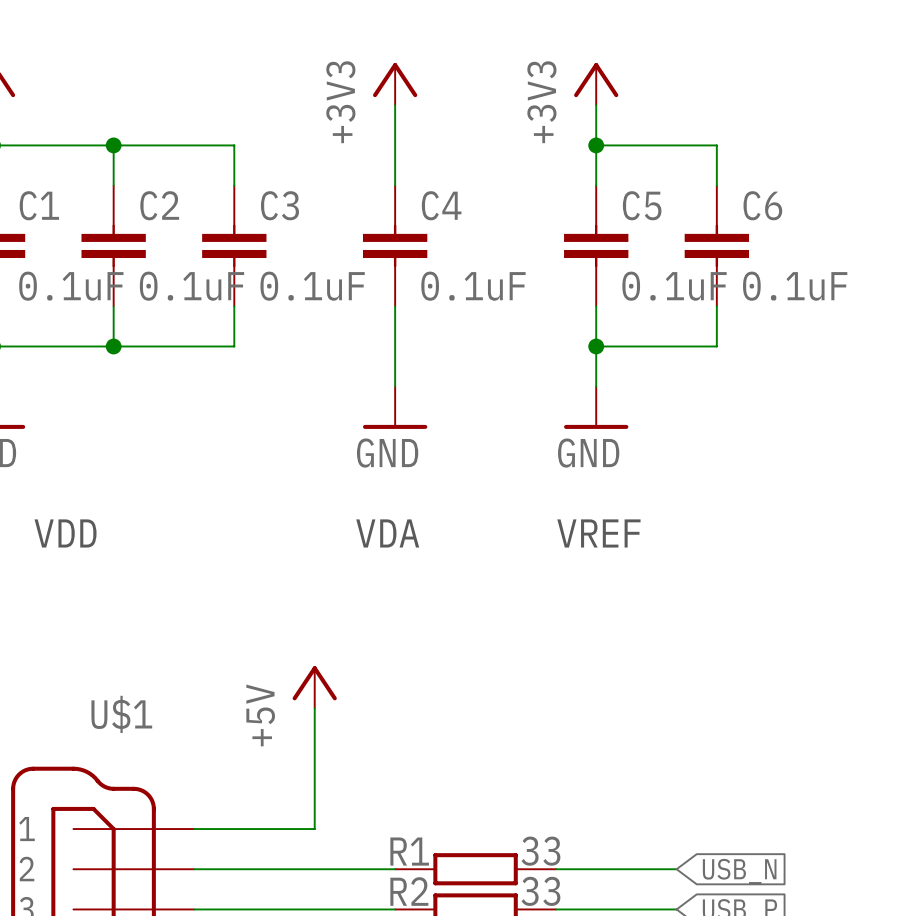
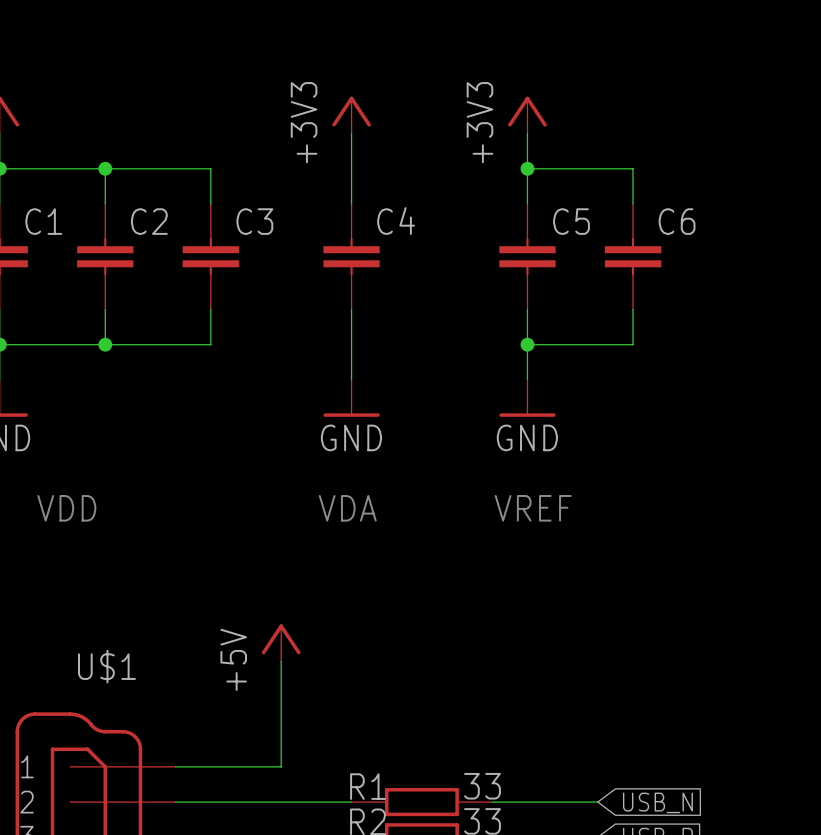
C1 value: 0.1uF (71, 286) -> none
C2 value: 0.1uF (191, 286) -> none
C3 value: 0.1uF (312, 286) -> none
C4 value: 0.1uF (473, 286) -> none
C5 value: 0.1uF (674, 286) -> none
C6 value: 0.1uF (795, 286) -> none

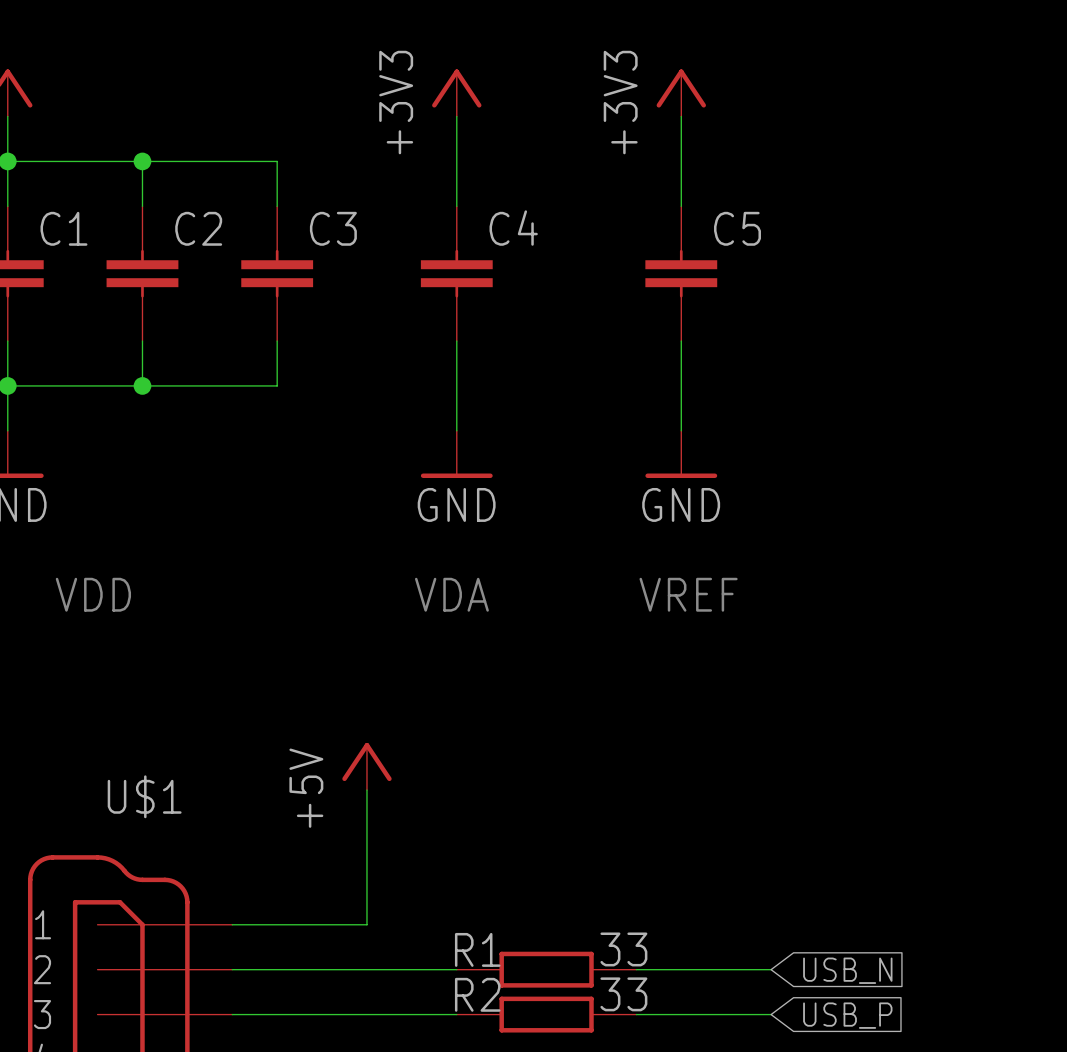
wire: (527, 168) (633, 168) (633, 203) -> none
junction: (527, 168) -> none
C6: (633, 256) -> none
wire: (633, 309) (633, 344) (527, 344) -> none
junction: (527, 344) -> none

